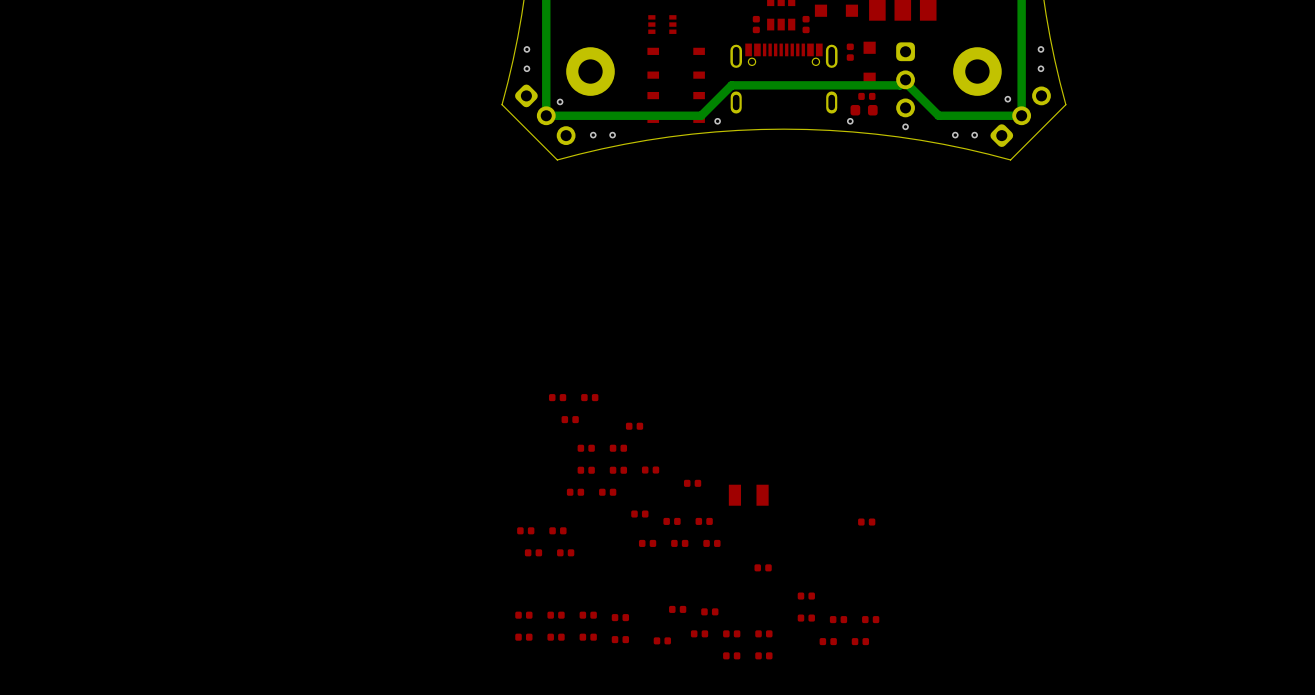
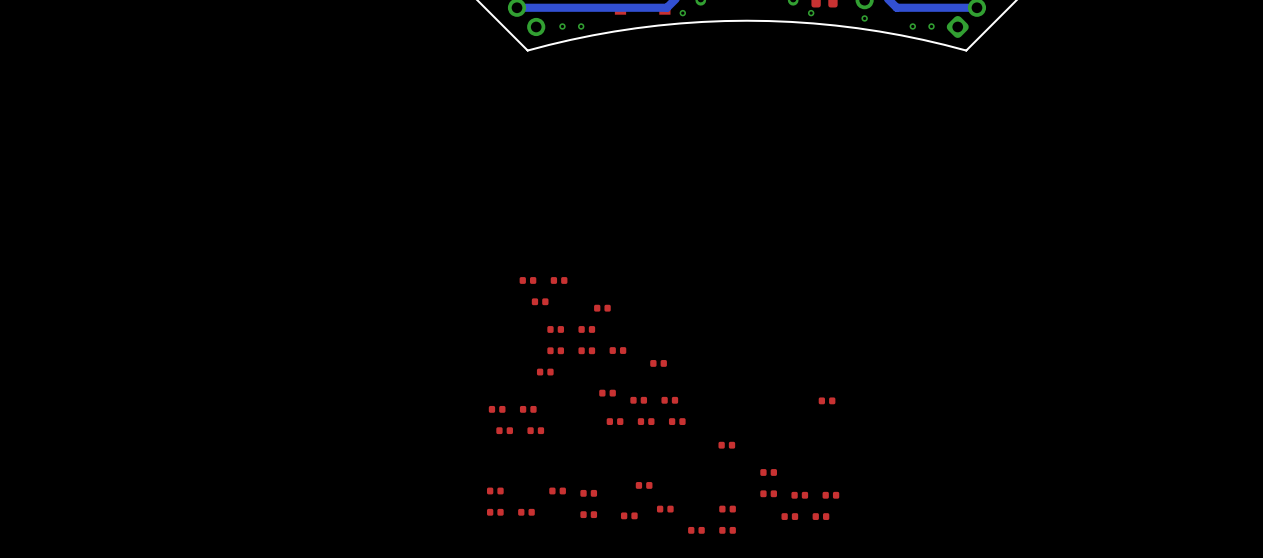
part: (607, 492) -> none
part: (748, 495) -> none
part: (709, 611) -> none
part: (556, 615) -> none
part: (731, 633) -> none
part: (588, 637) -> none

